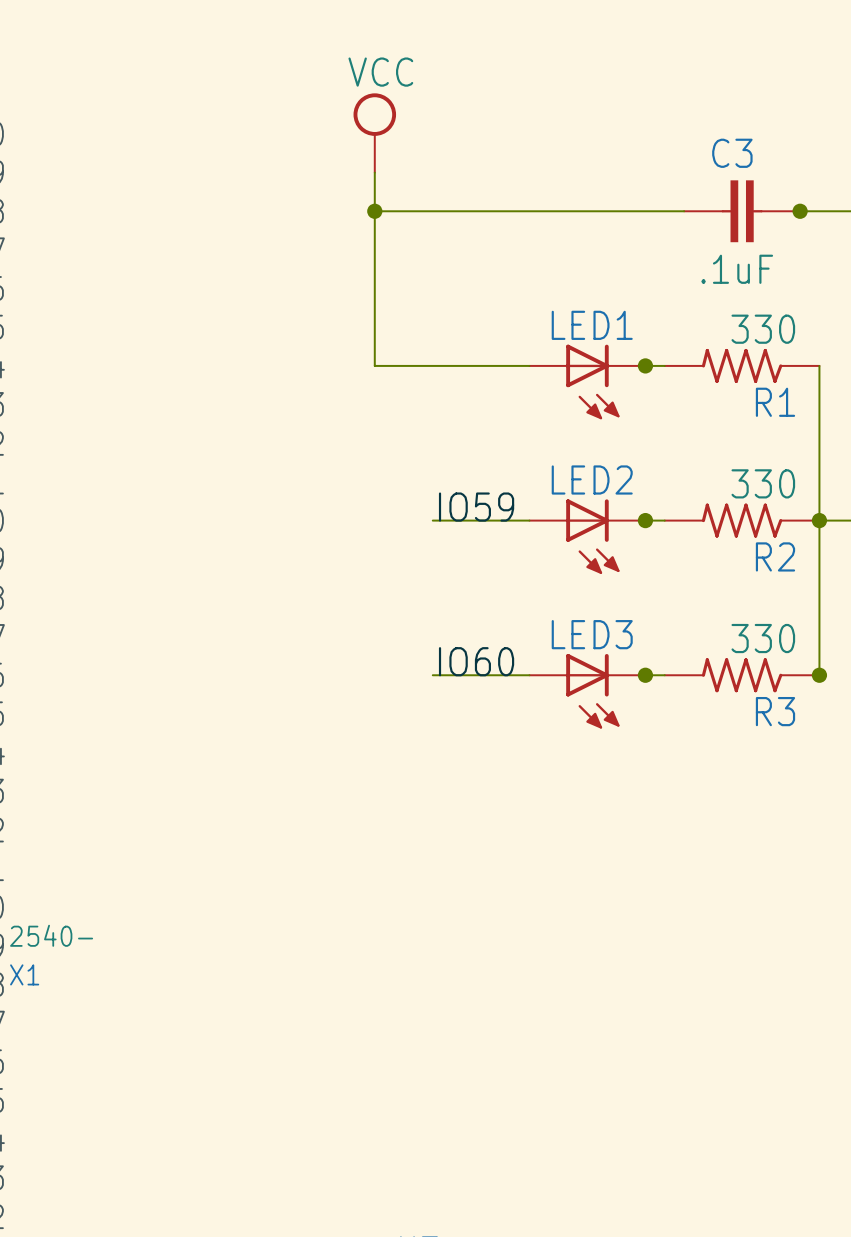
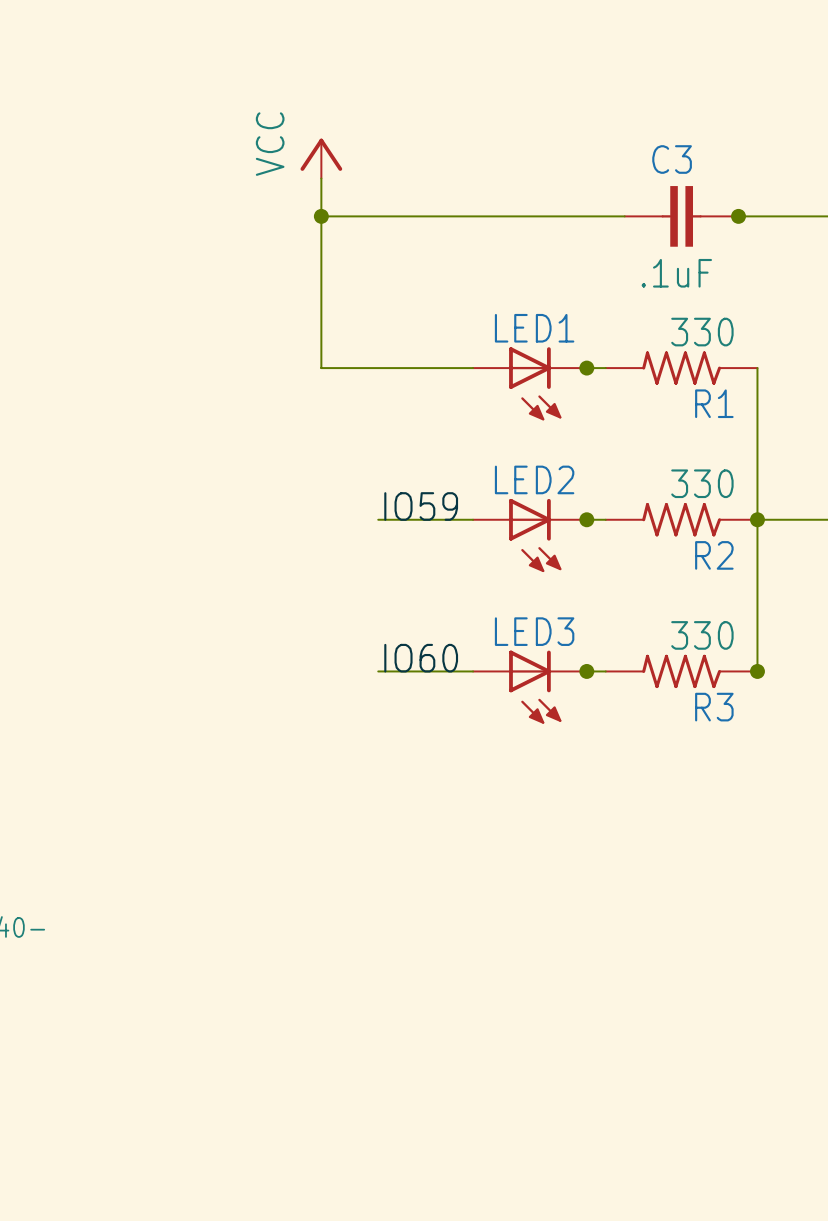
power symbol: VCC (374, 132) -> none
power symbol: none -> VCC (321, 158)

